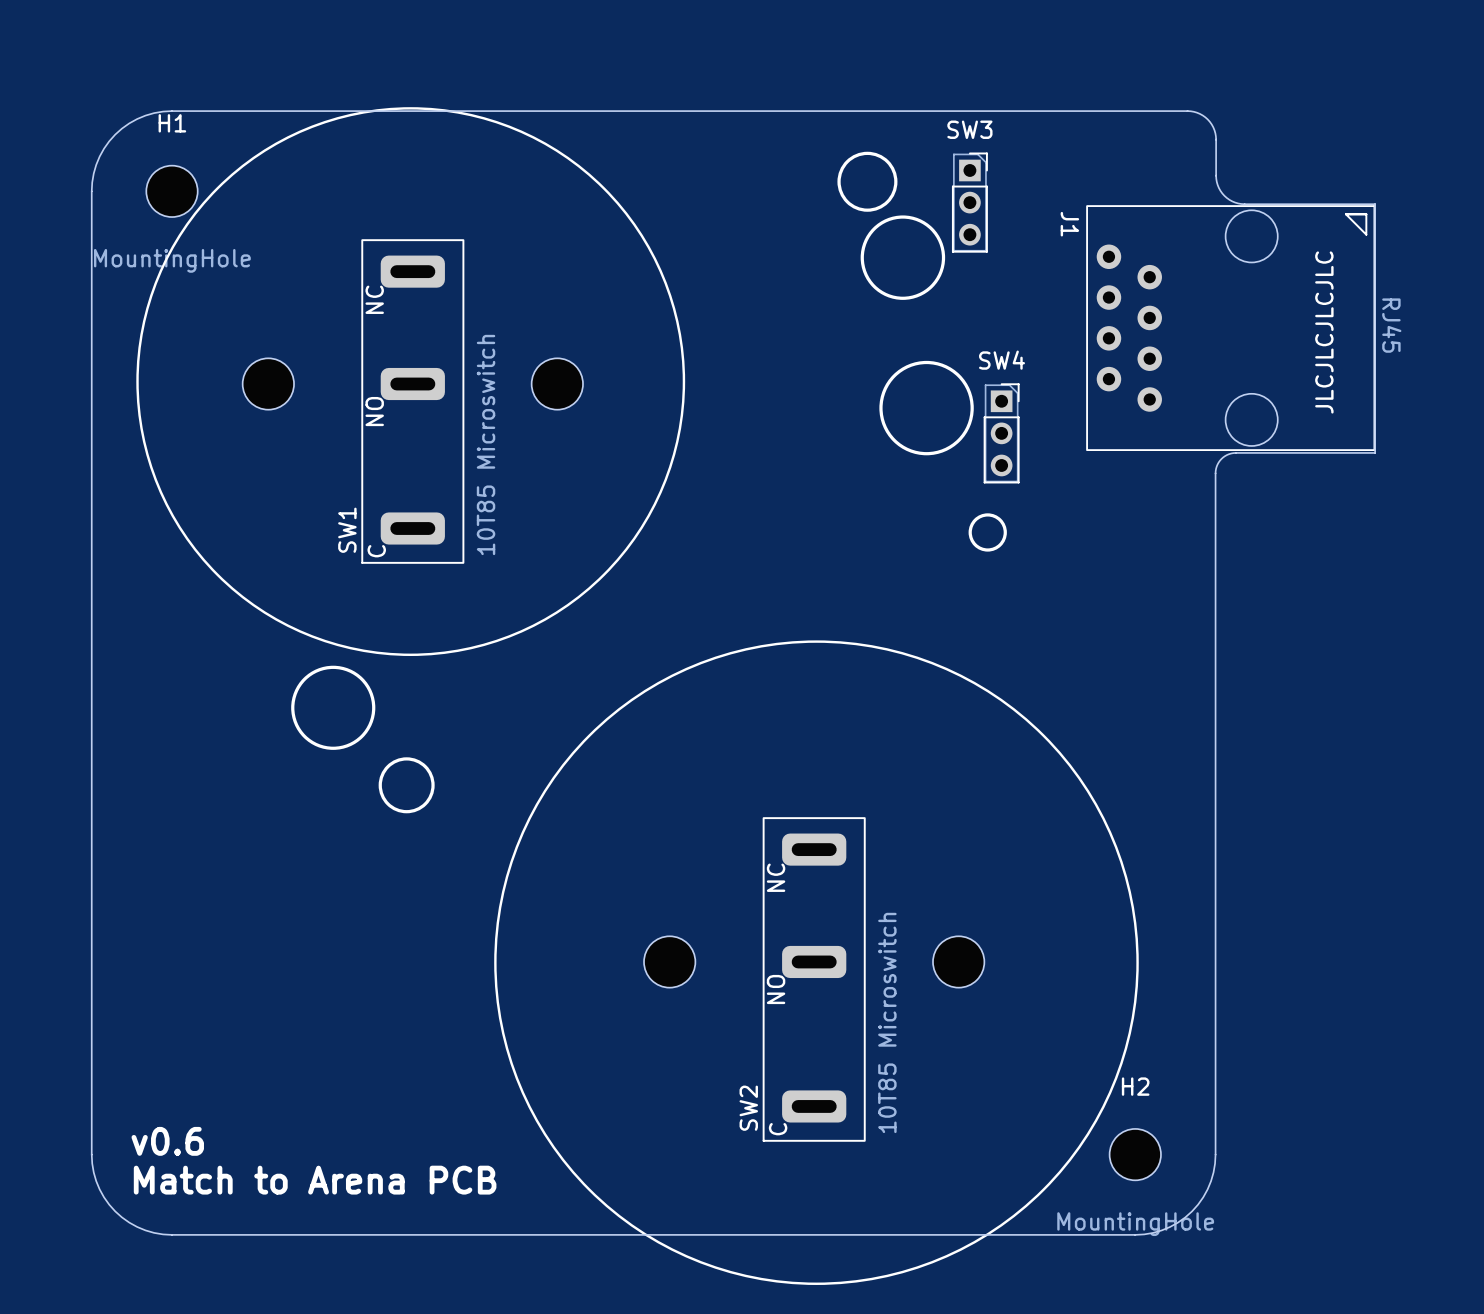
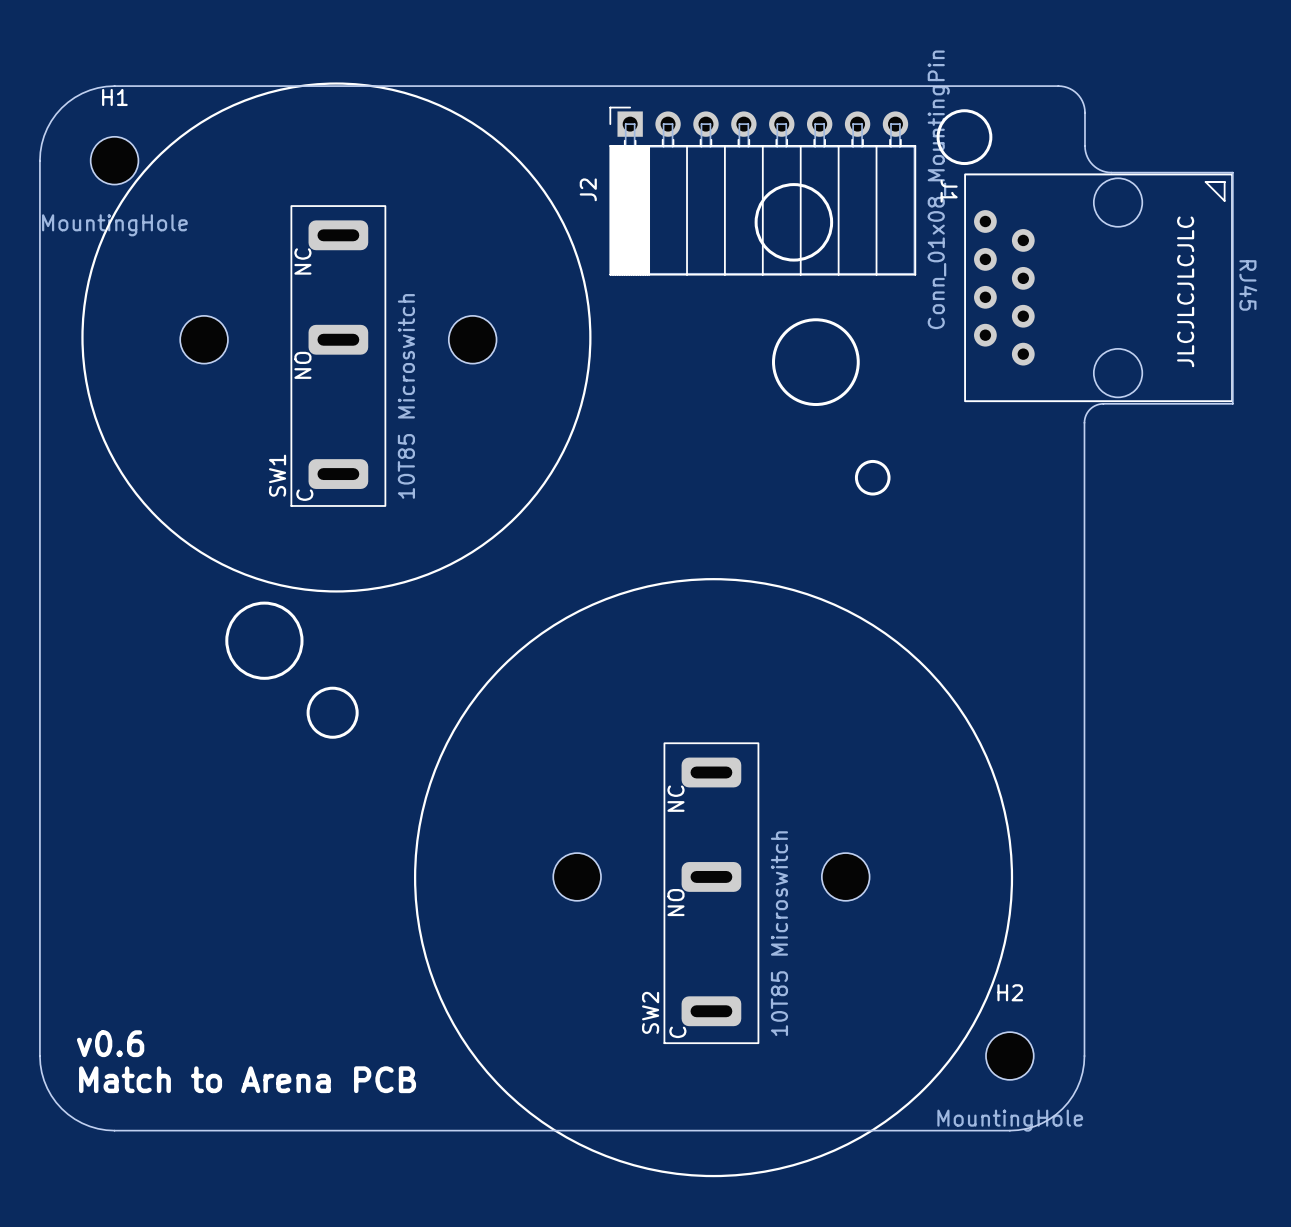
drawing position: (867, 181) -> (964, 137)
SW3: (969, 202) -> none
J2: none -> Conn_01x08_MountingPin (762, 191)
SW4: (1001, 433) -> none

